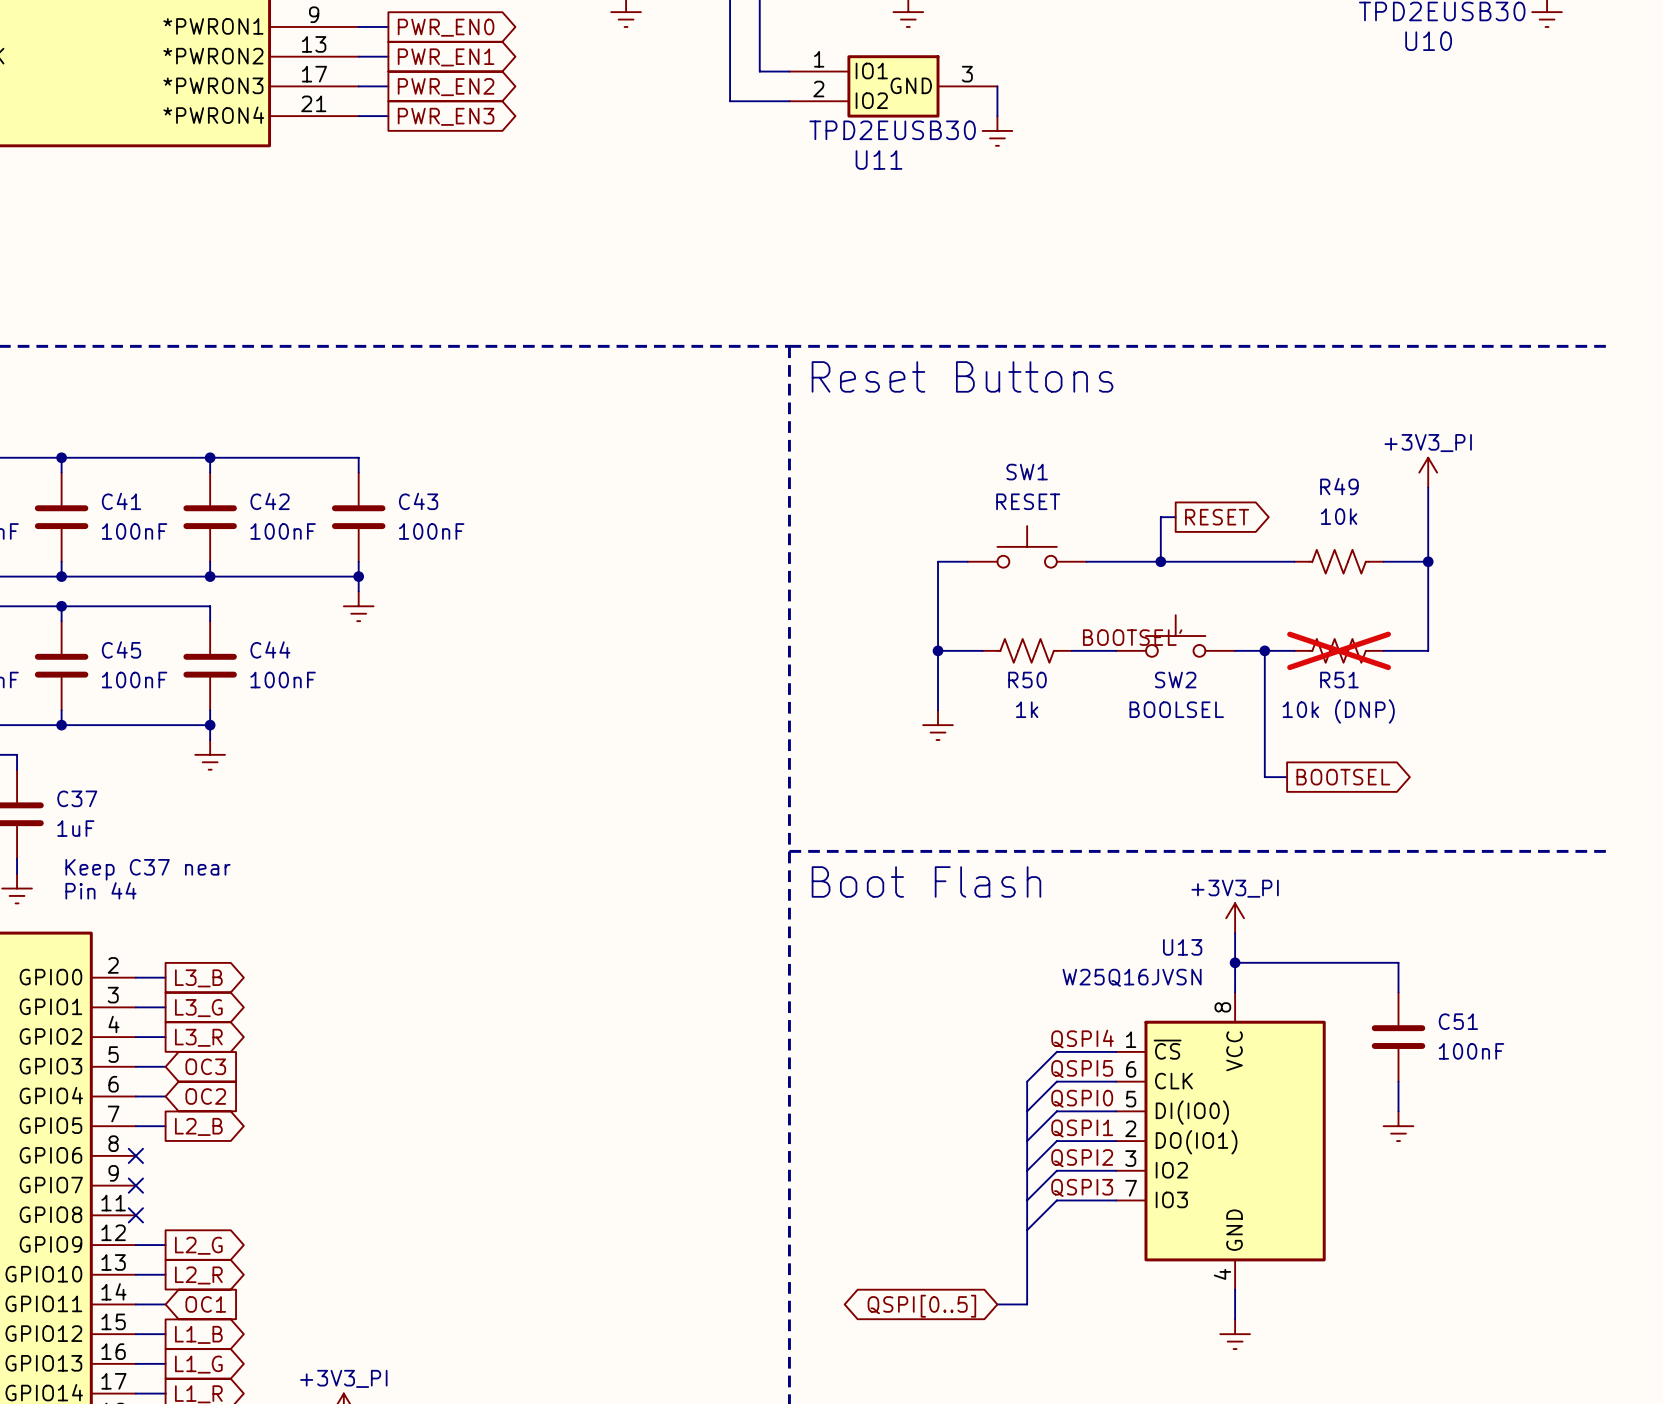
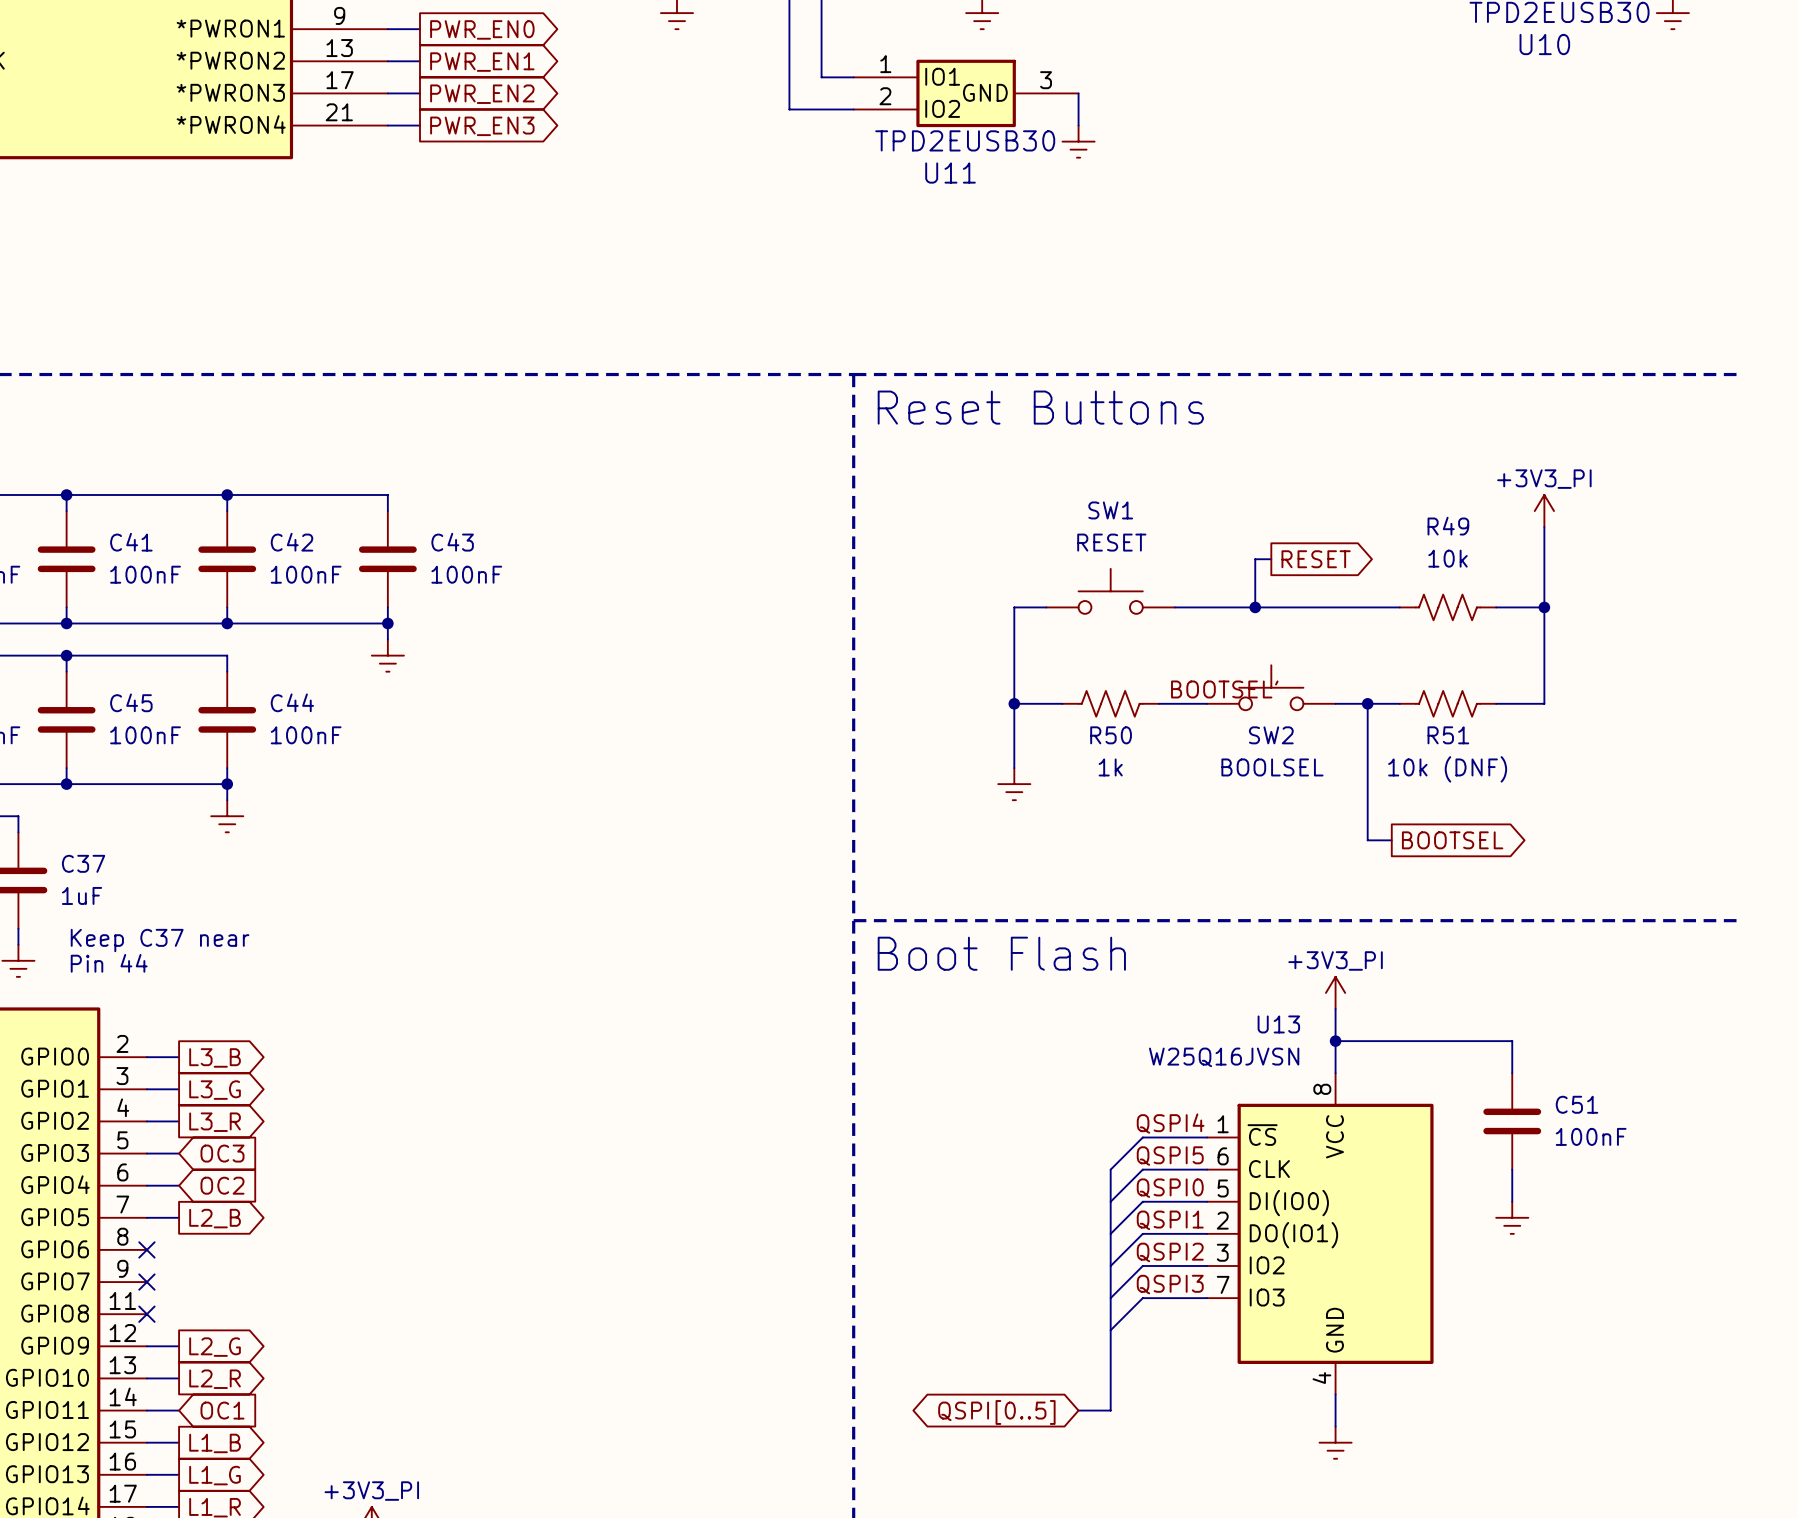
R51 do-not-place cross: (1339, 650) -> none
R51 value: 10k (DNP) (1338, 711) -> 10k (DNF) (1447, 769)

